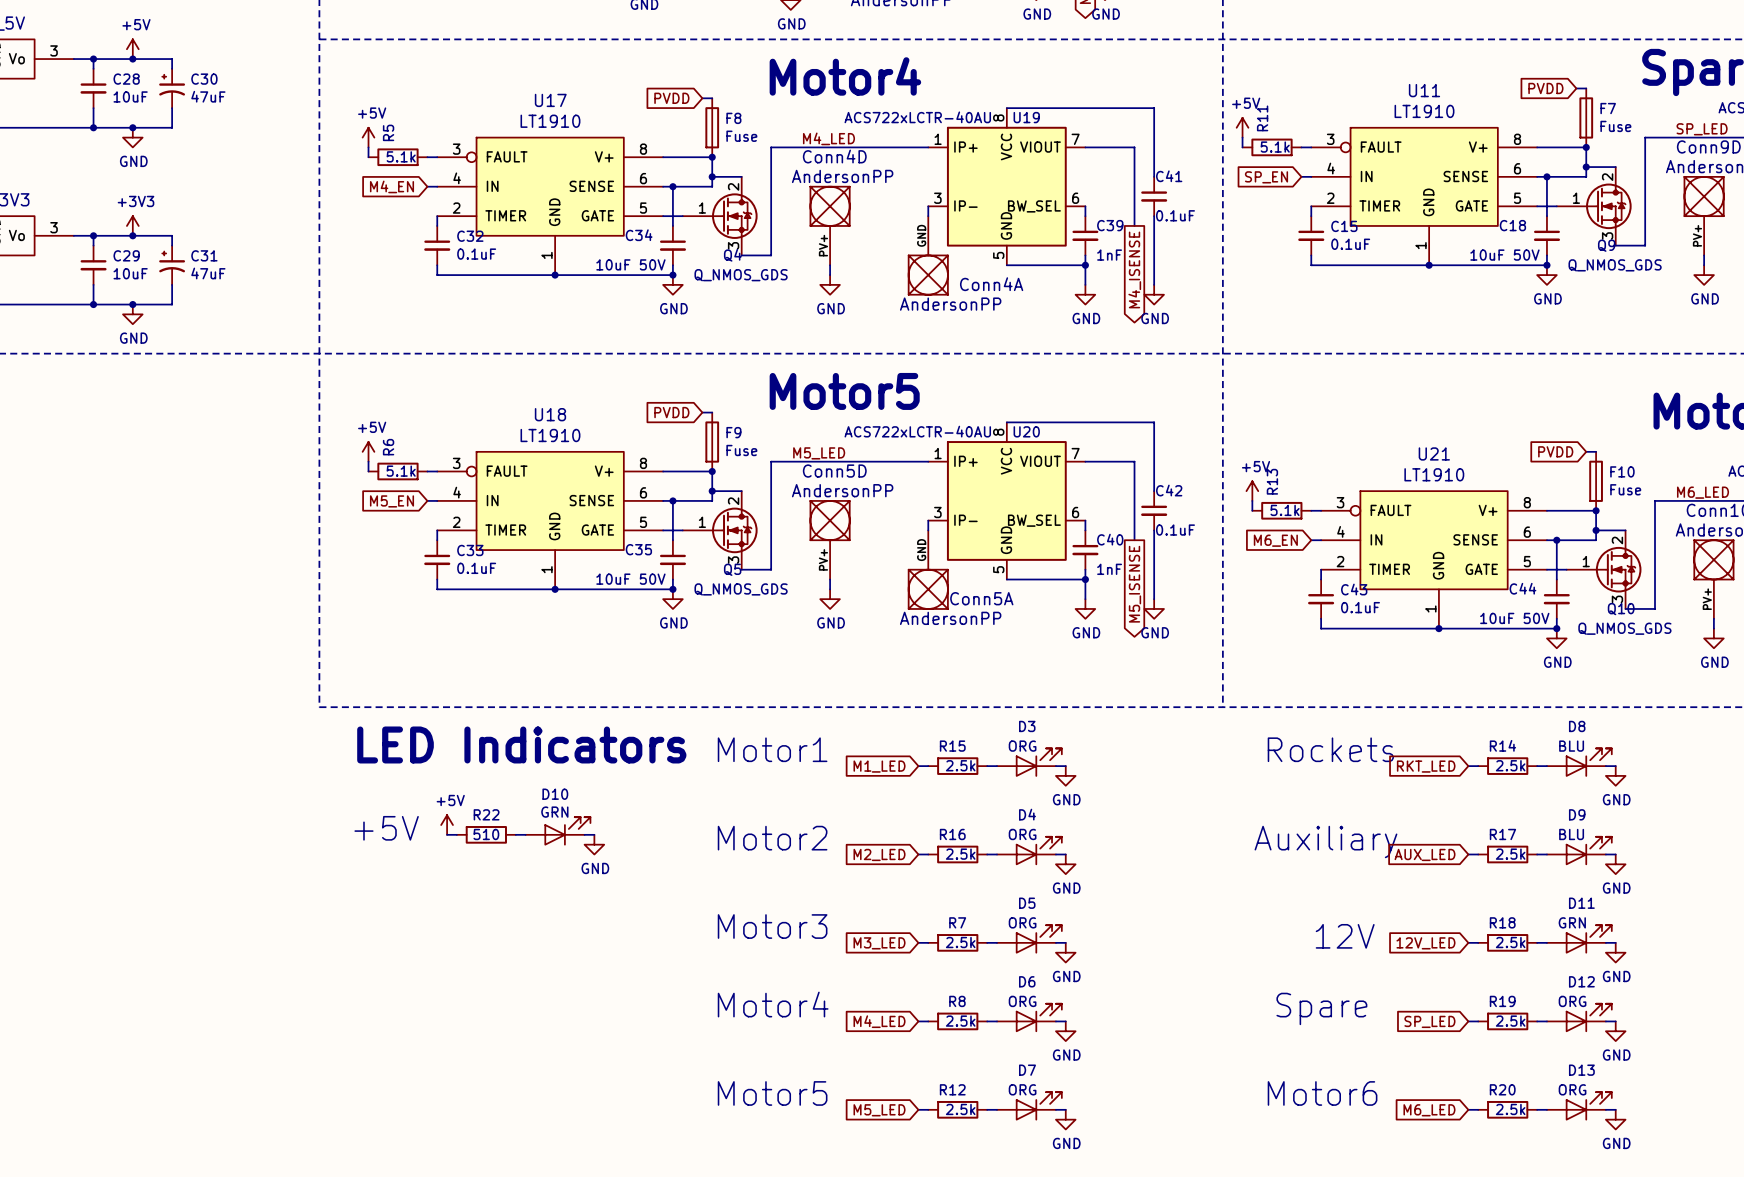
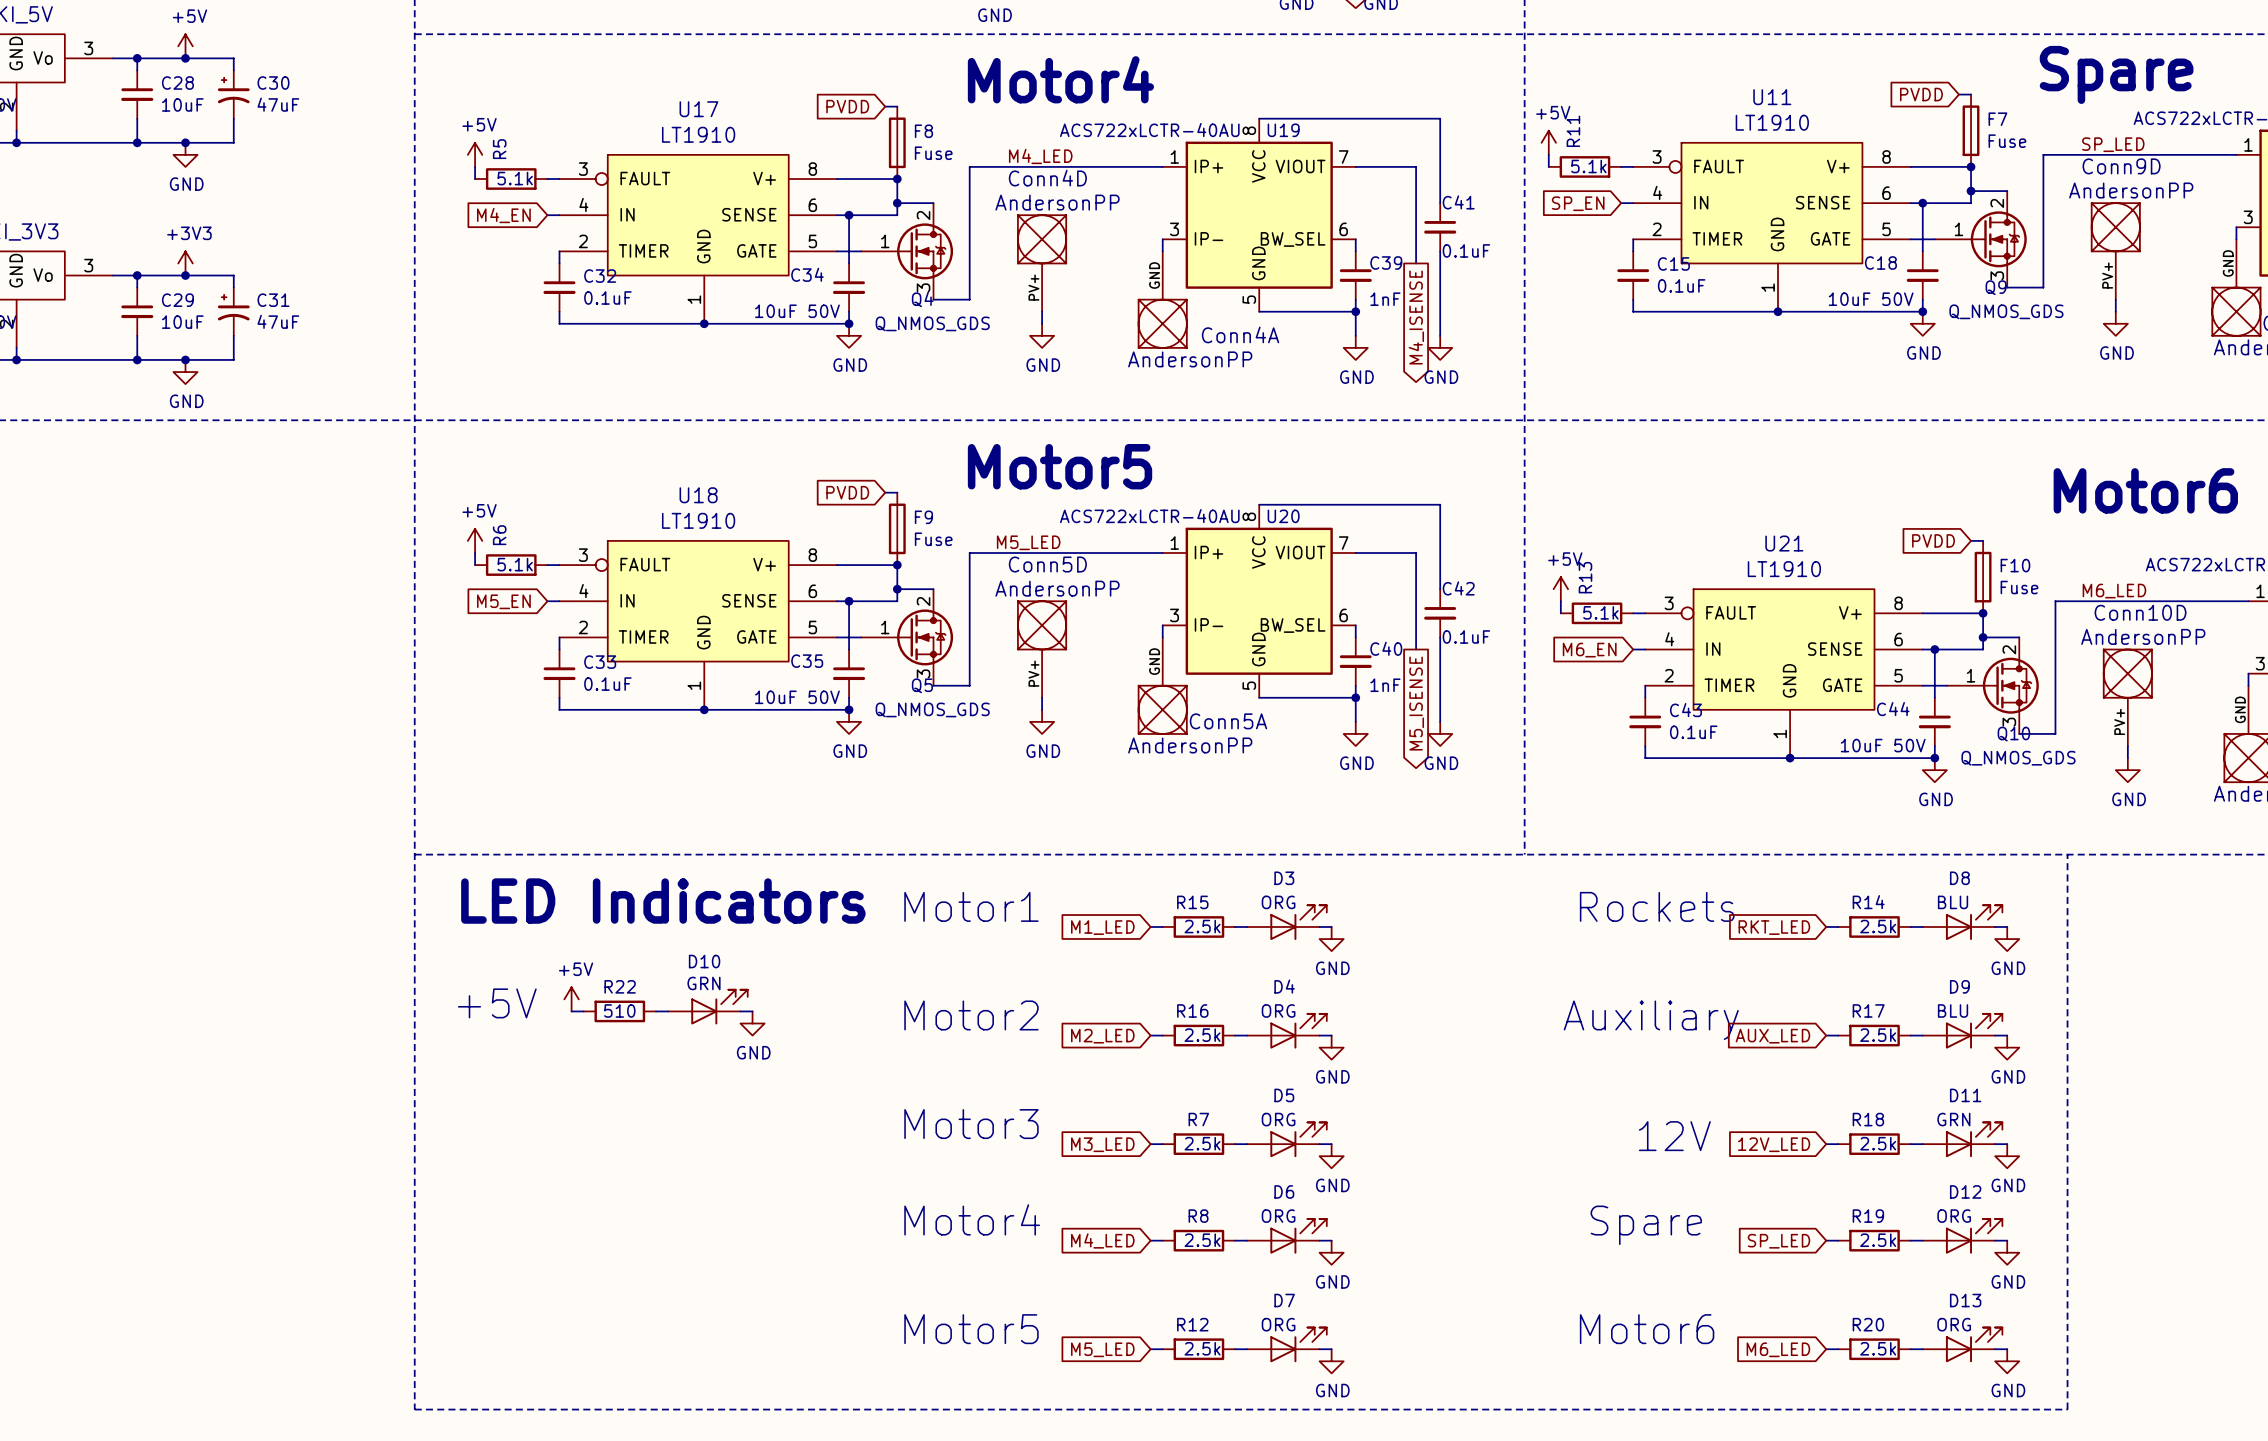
line: none -> (414, 854) (414, 1409) (2067, 1409) (2067, 854)

